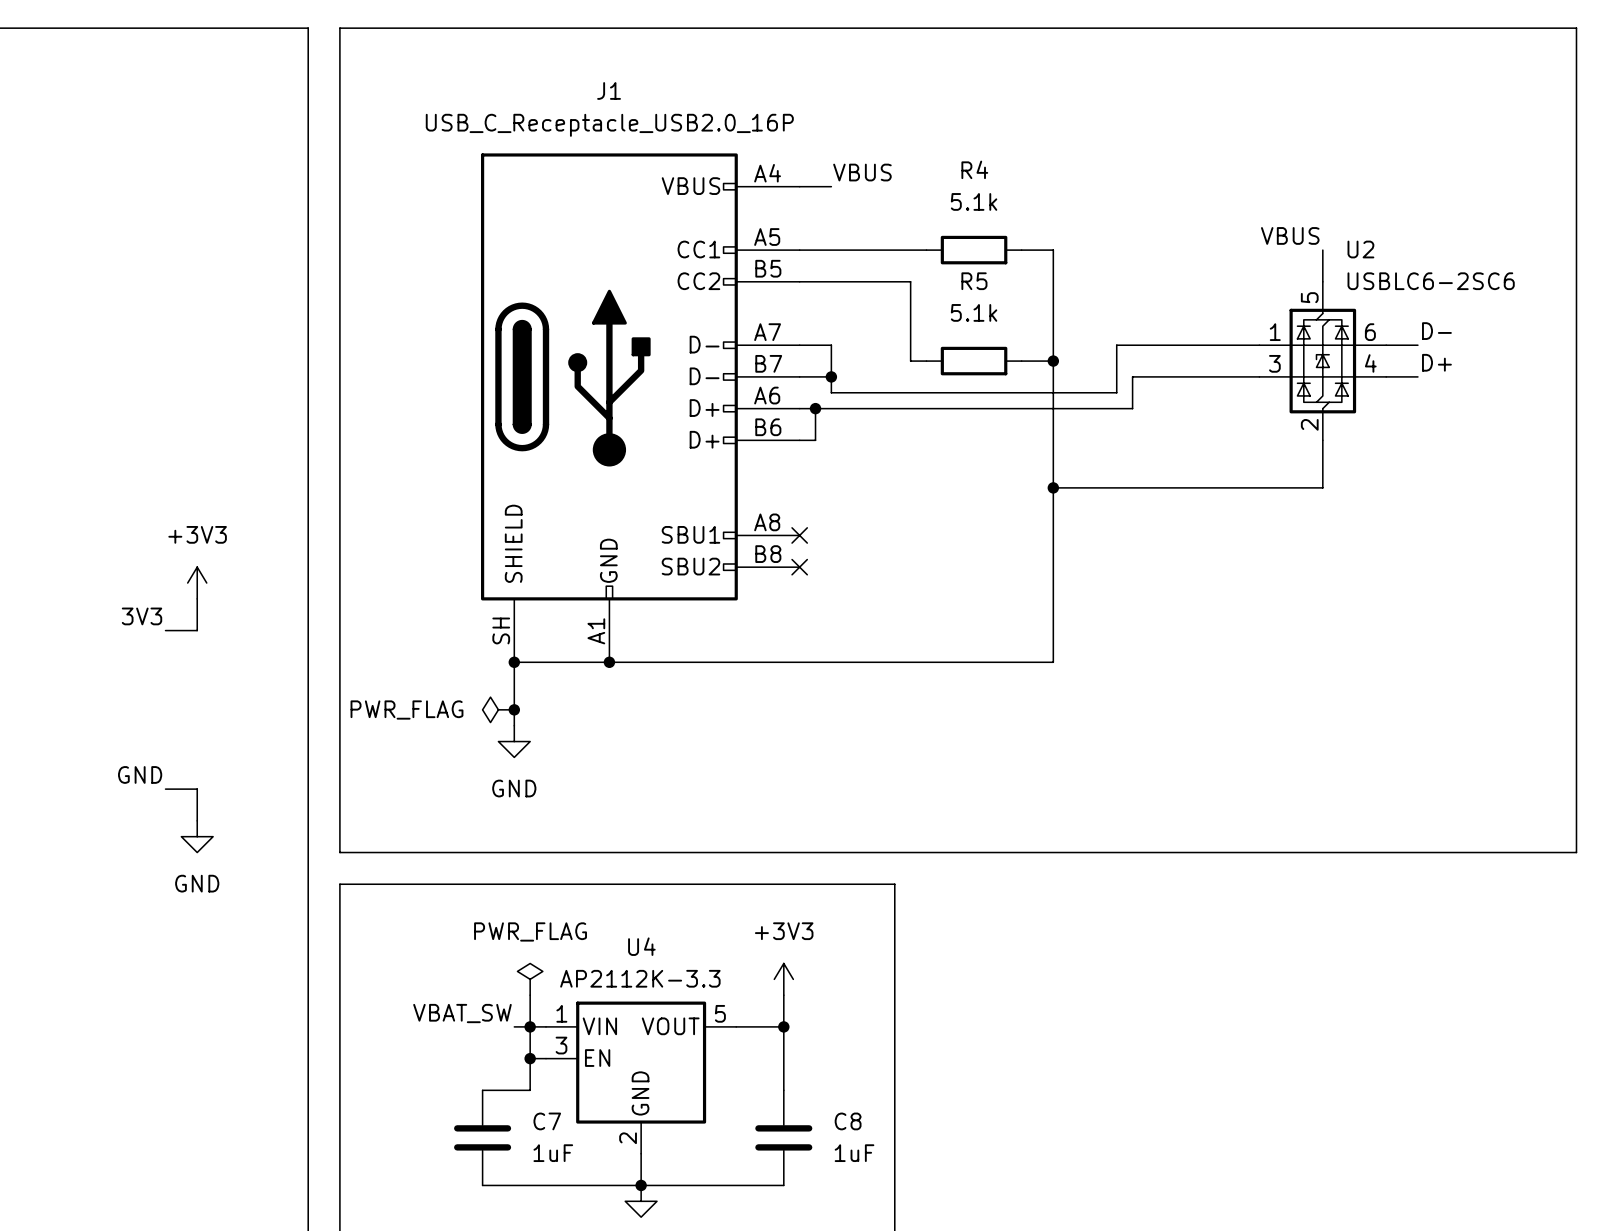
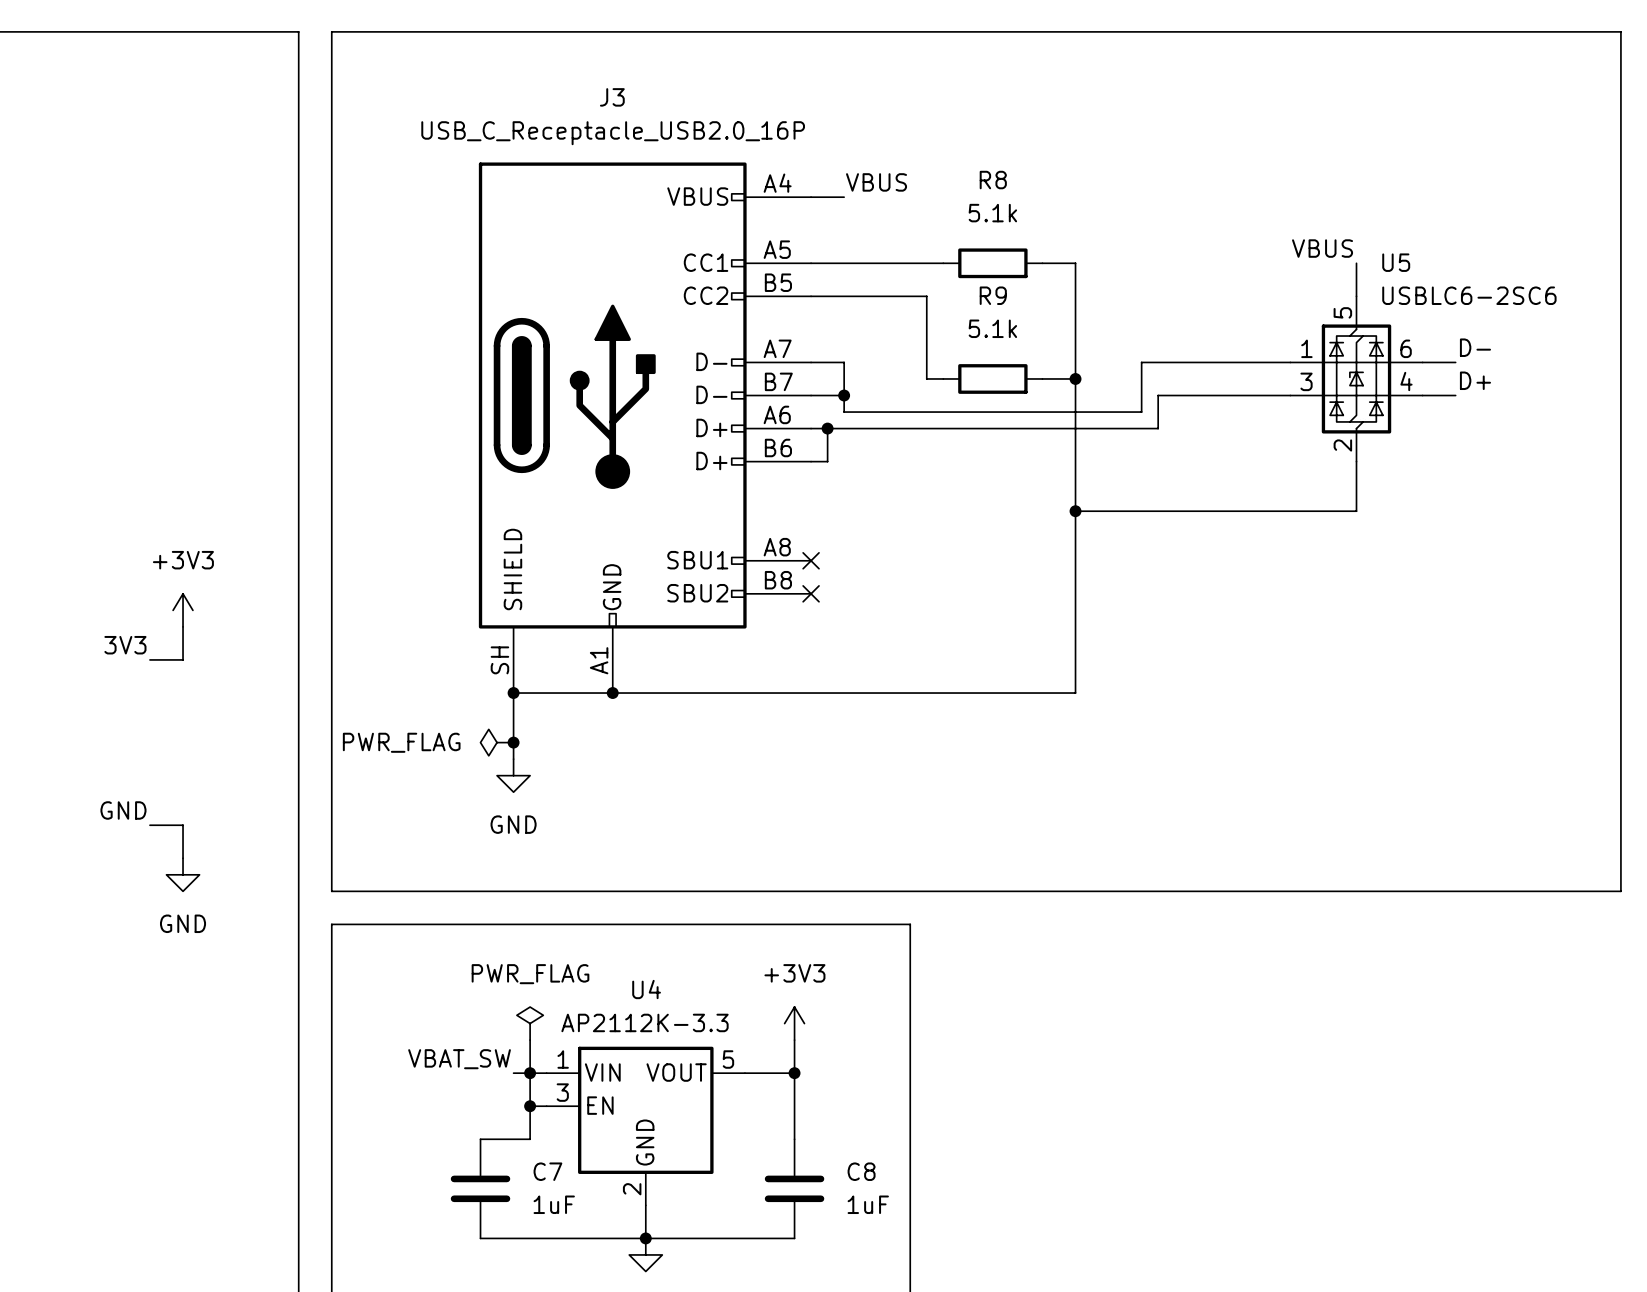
J1 name: J1 (609, 90) -> J3 (612, 97)
R4 name: R4 (974, 169) -> R8 (993, 180)
U2 name: U2 (1360, 249) -> U5 (1396, 262)
R5 name: R5 (974, 281) -> R9 (993, 295)

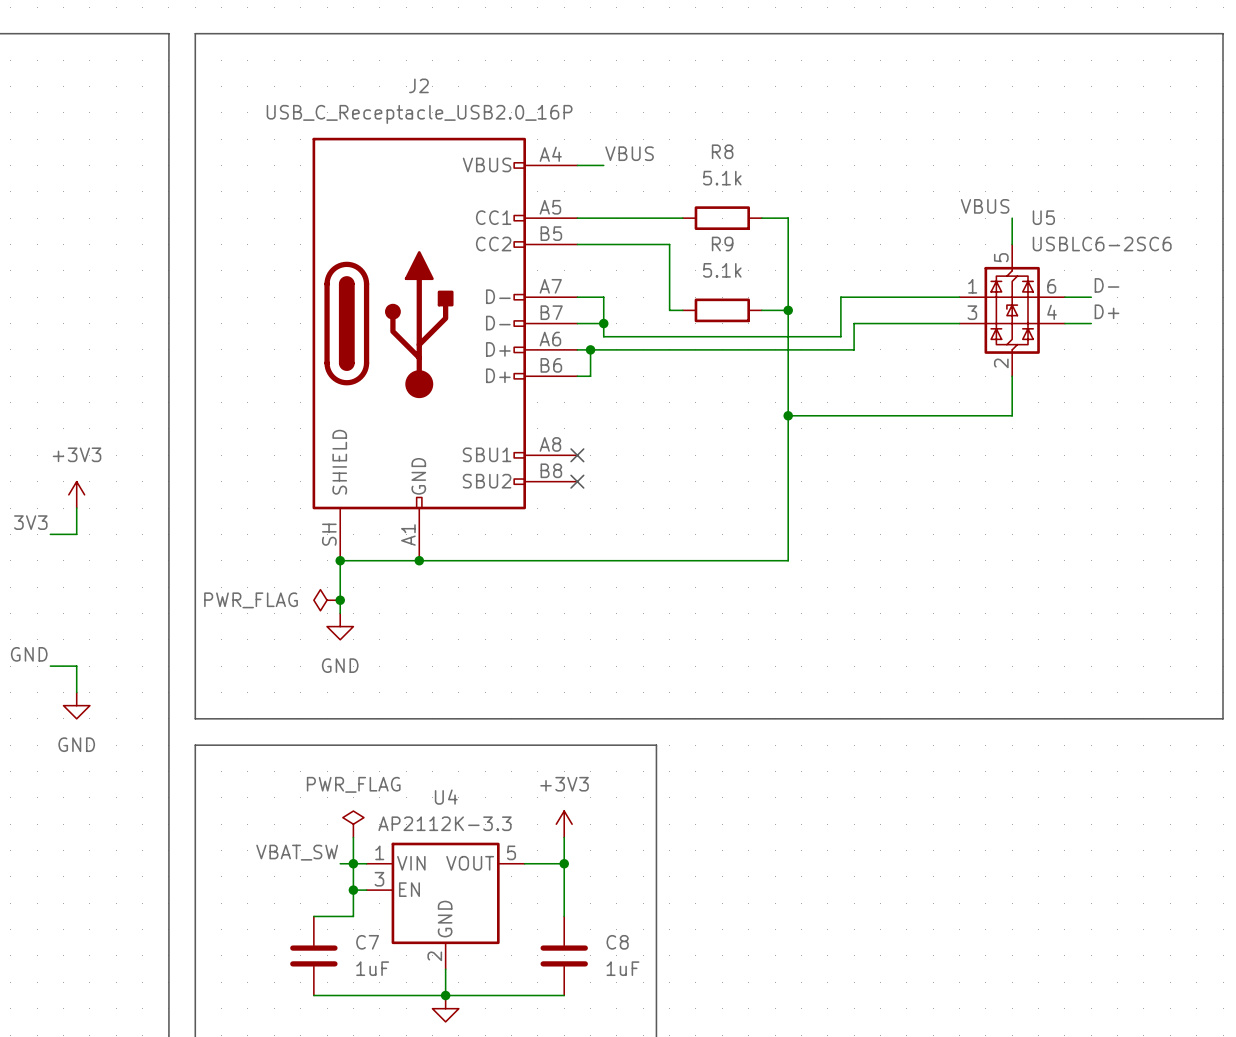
J3 name: J3 (612, 97) -> J2 (418, 85)

